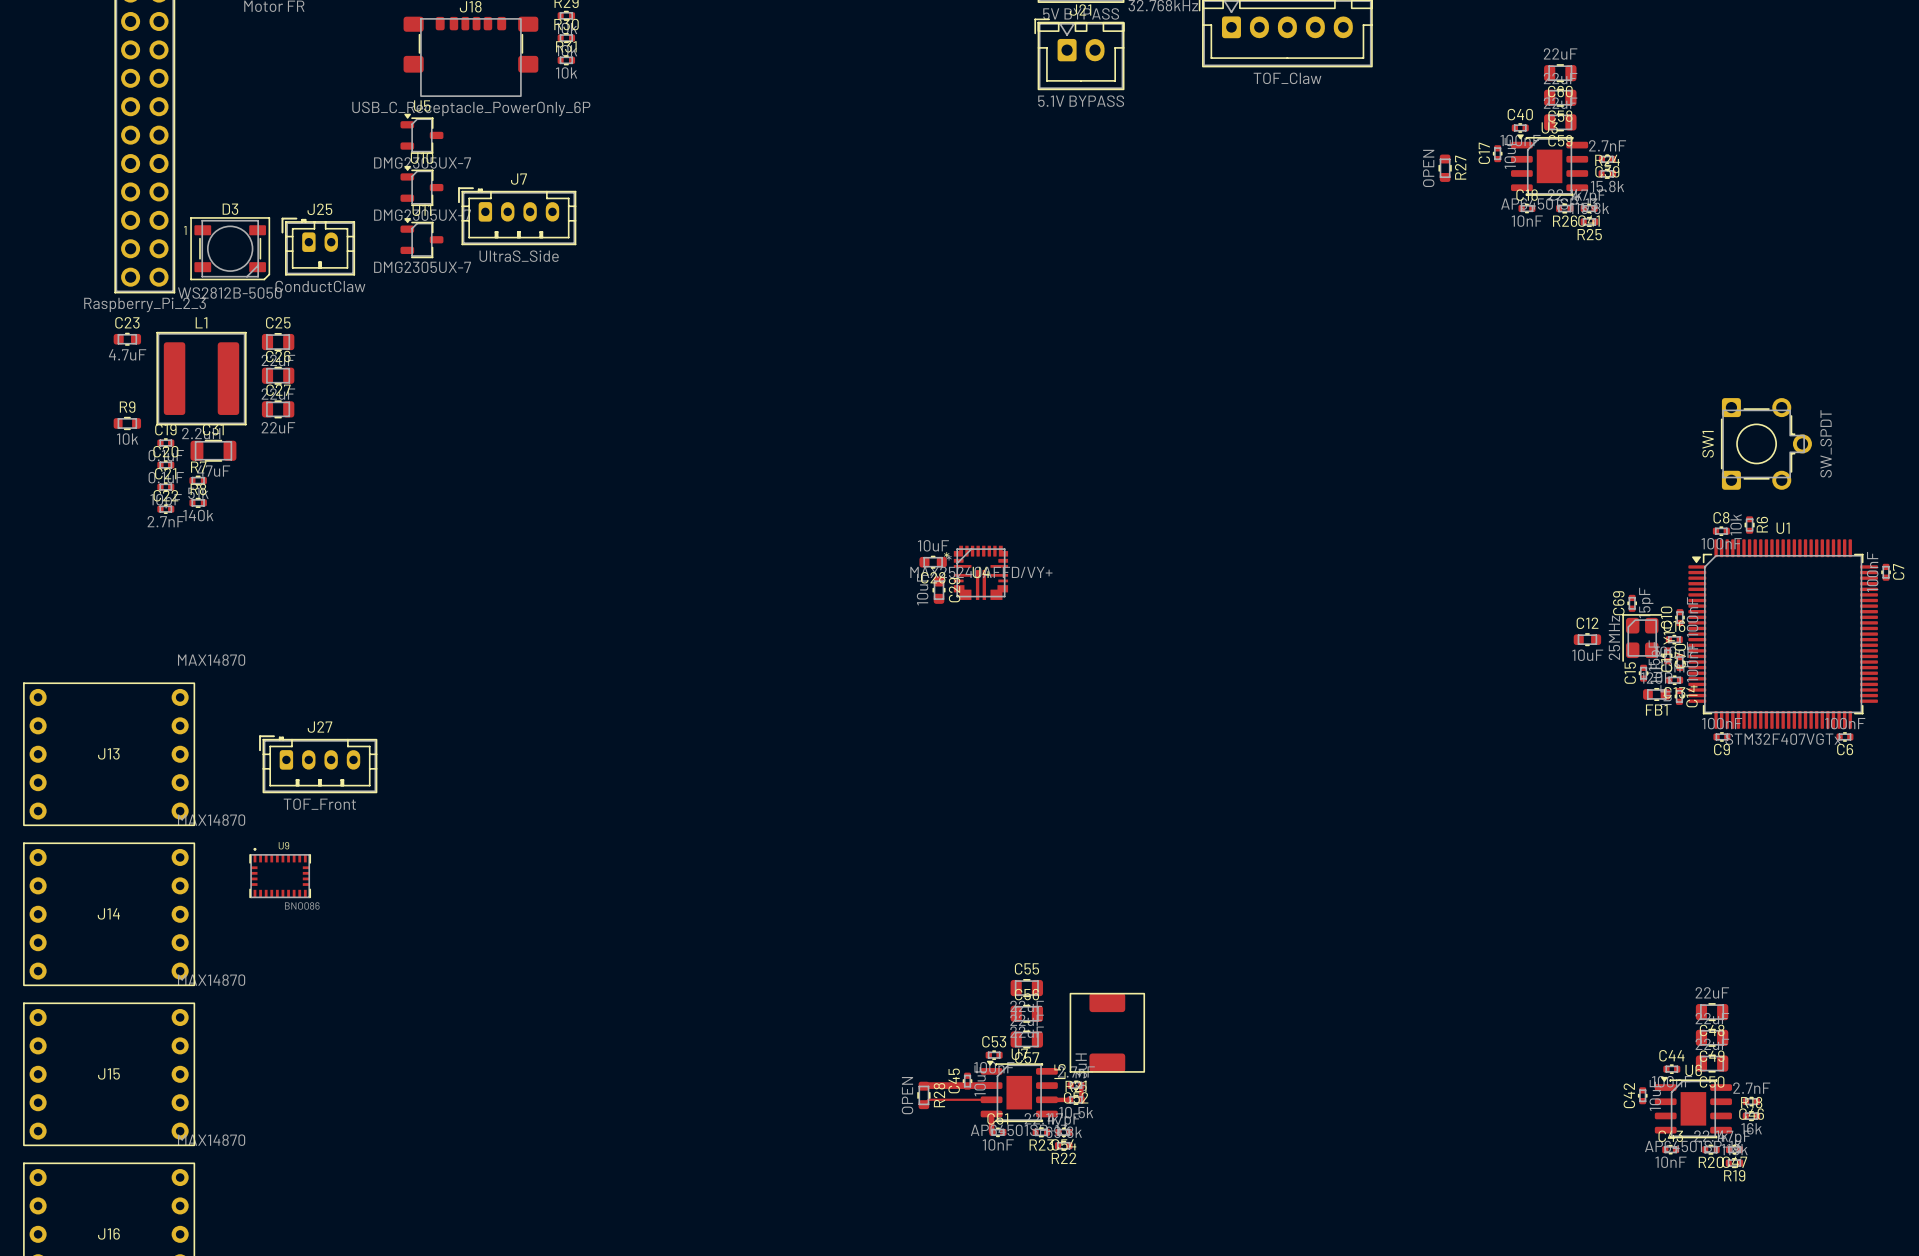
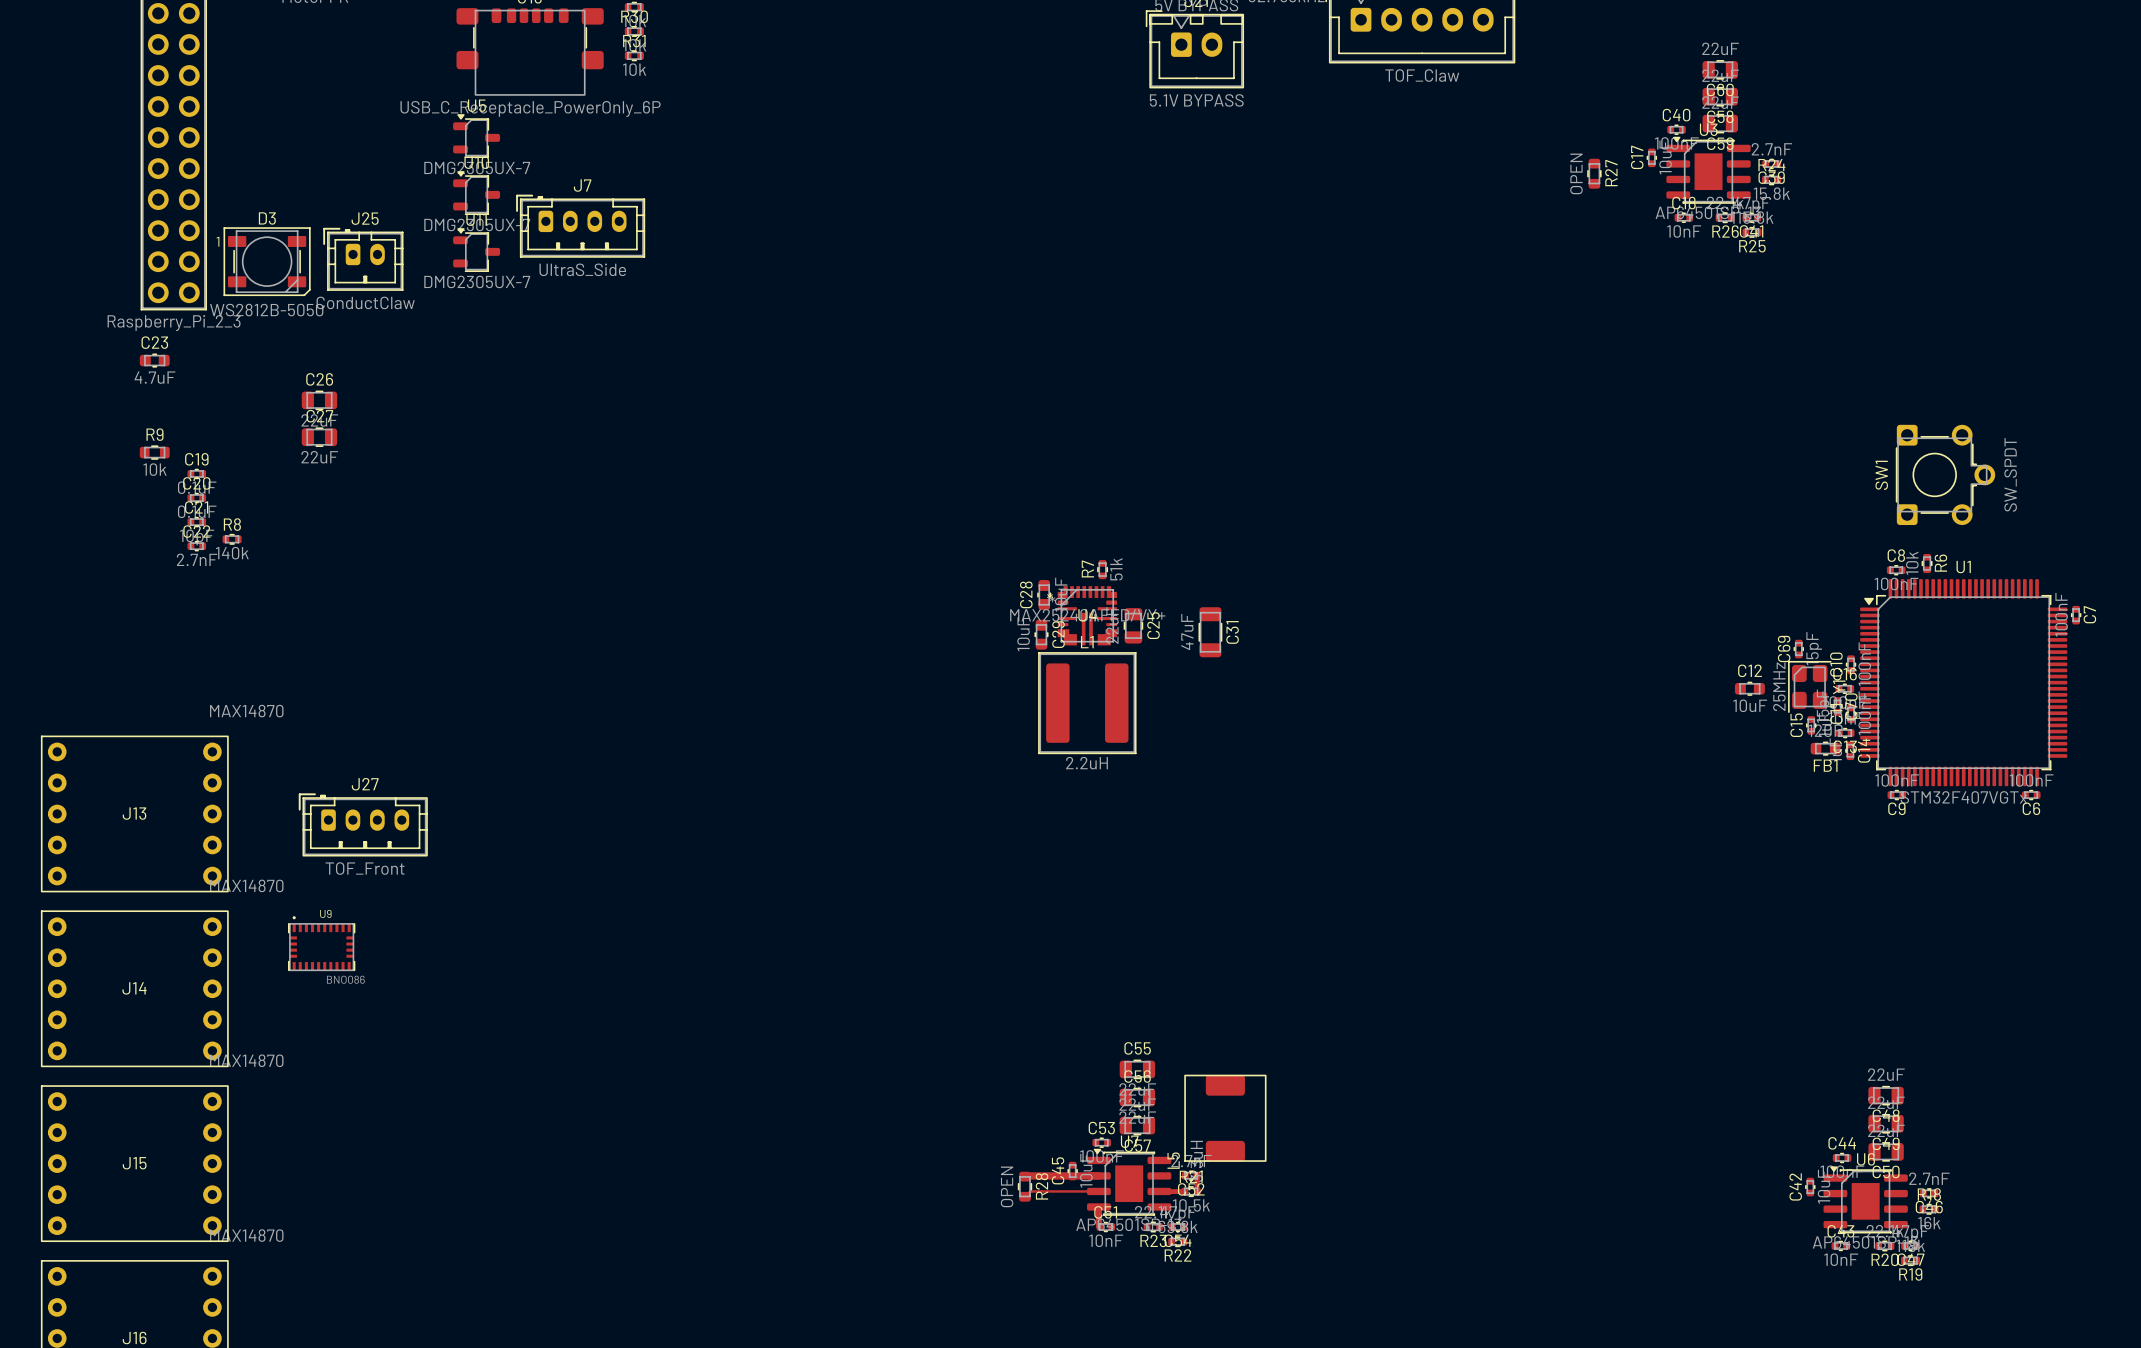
C25 rotation: 0° (278, 342) -> 90° clockwise (1133, 625)
C25 position: (278, 342) -> (1133, 625)
L1 position: (201, 378) -> (1087, 703)
C31 rotation: 0° (213, 450) -> 90° clockwise (1210, 632)
C31 position: (213, 450) -> (1210, 632)
R7 rotation: 0° (198, 480) -> 90° clockwise (1102, 569)
R7 position: (198, 480) -> (1102, 569)
C28 rotation: 0° (933, 562) -> 90° clockwise (1044, 594)

